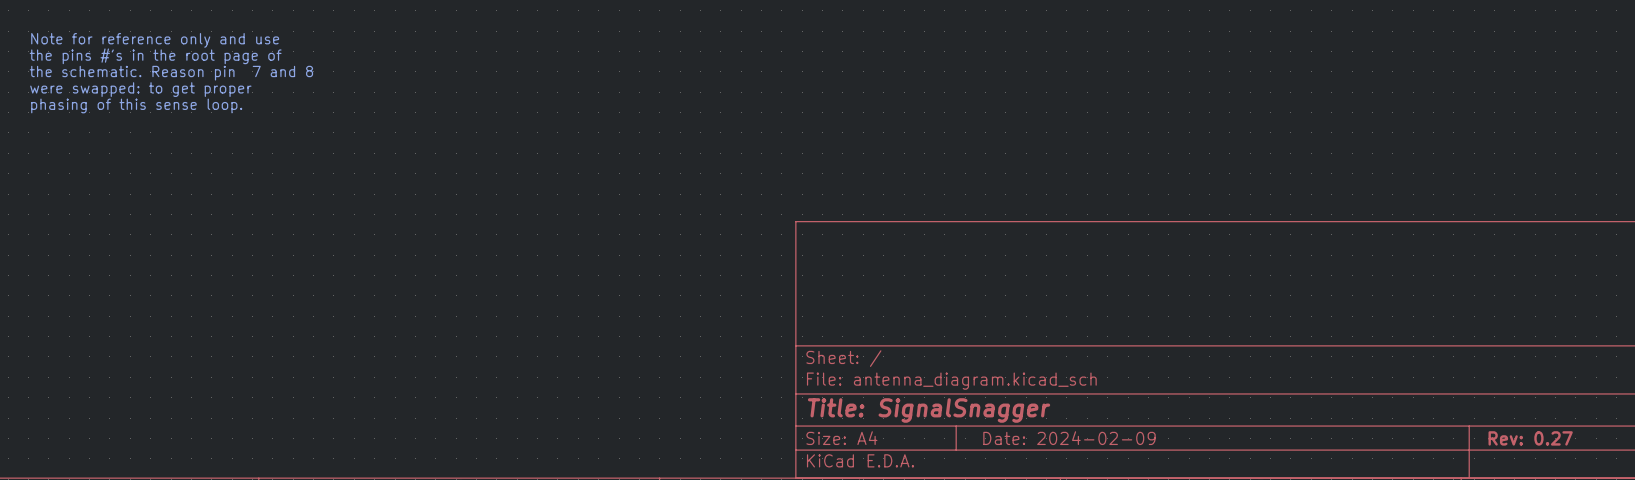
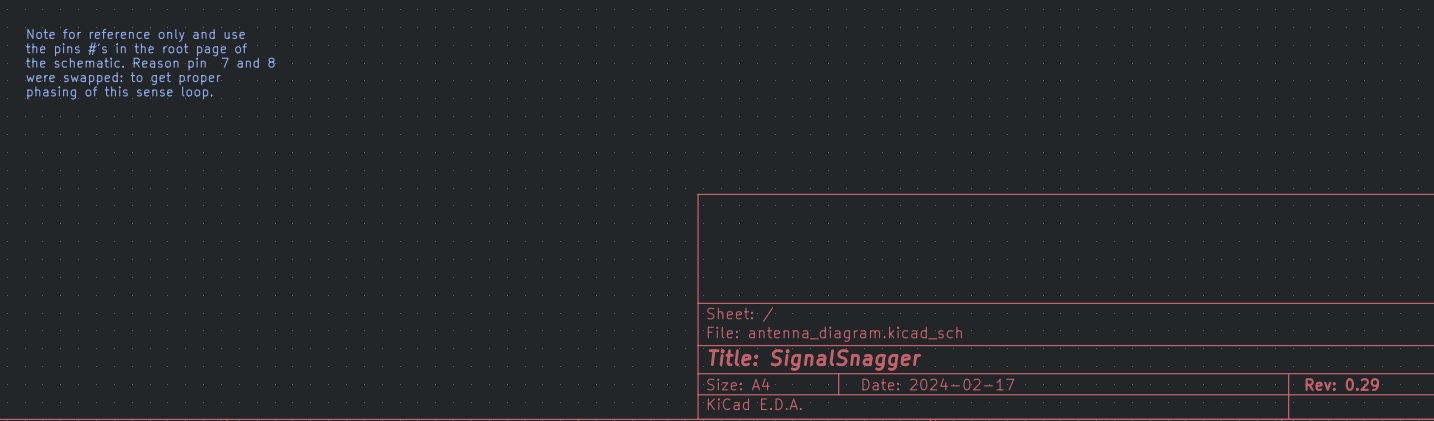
title block: Date: 2024-02-09 (1069, 438) -> Date: 2024-02-17 (938, 384)
title block: Rev: 0.27 (1530, 438) -> Rev: 0.29 (1342, 384)

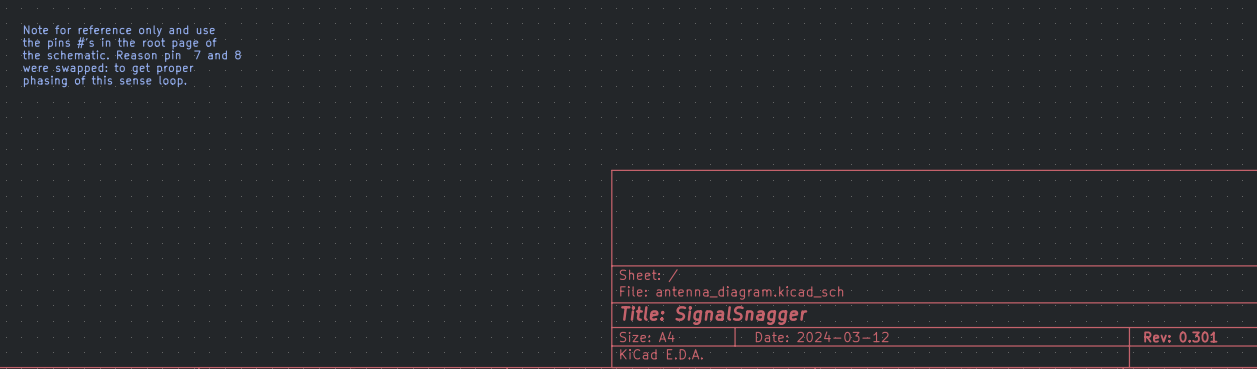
title block: Date: 2024-02-17 (938, 384) -> Date: 2024-03-12 (822, 336)
title block: Rev: 0.29 (1342, 384) -> Rev: 0.301 (1180, 337)

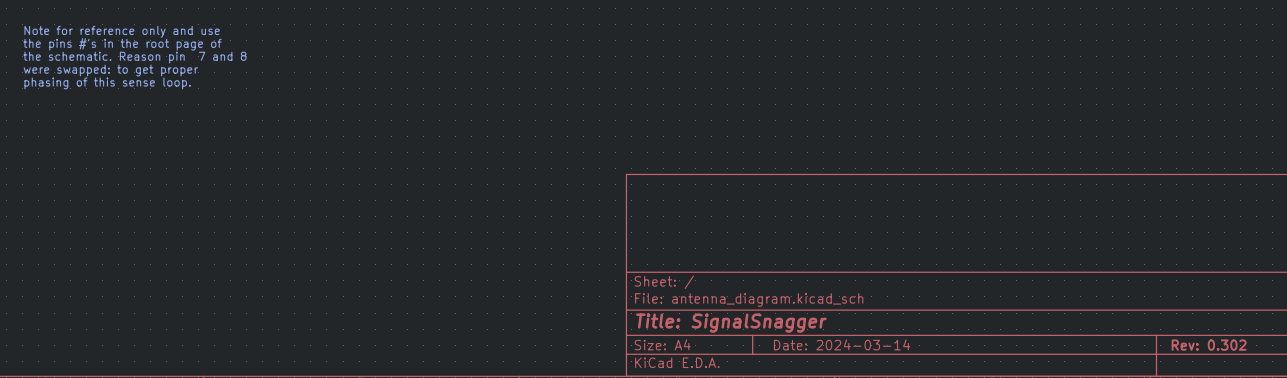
title block: Date: 2024-03-12 (822, 336) -> Date: 2024-03-14 (842, 344)
title block: Rev: 0.301 (1180, 337) -> Rev: 0.302 (1209, 345)

